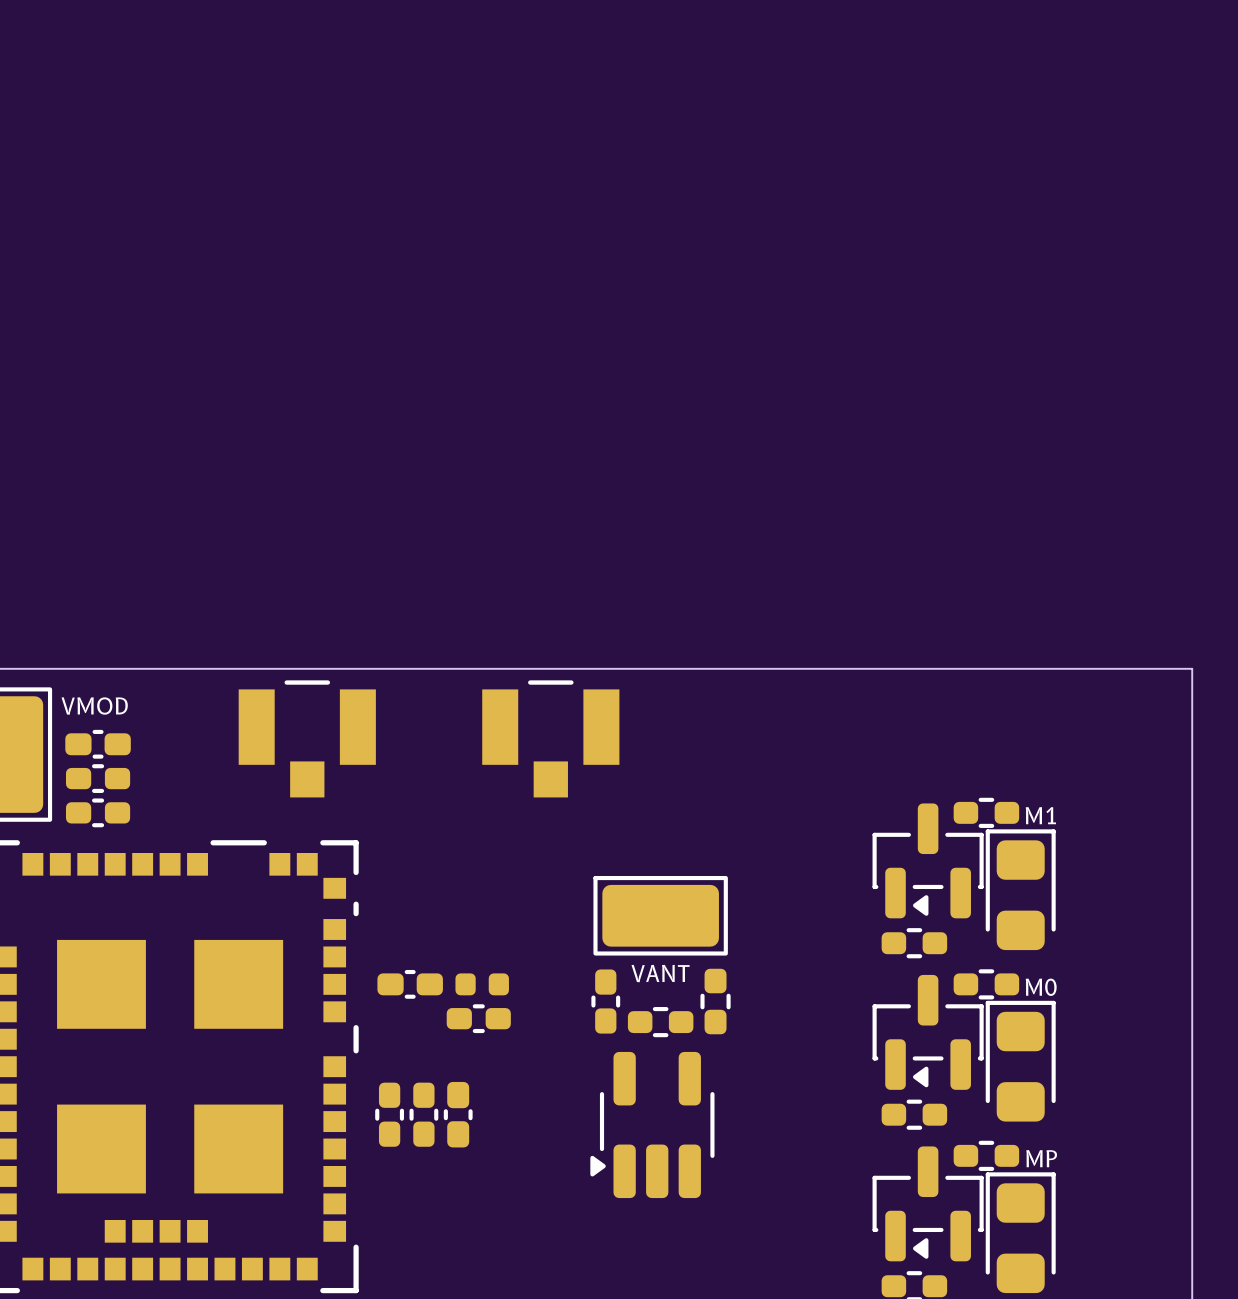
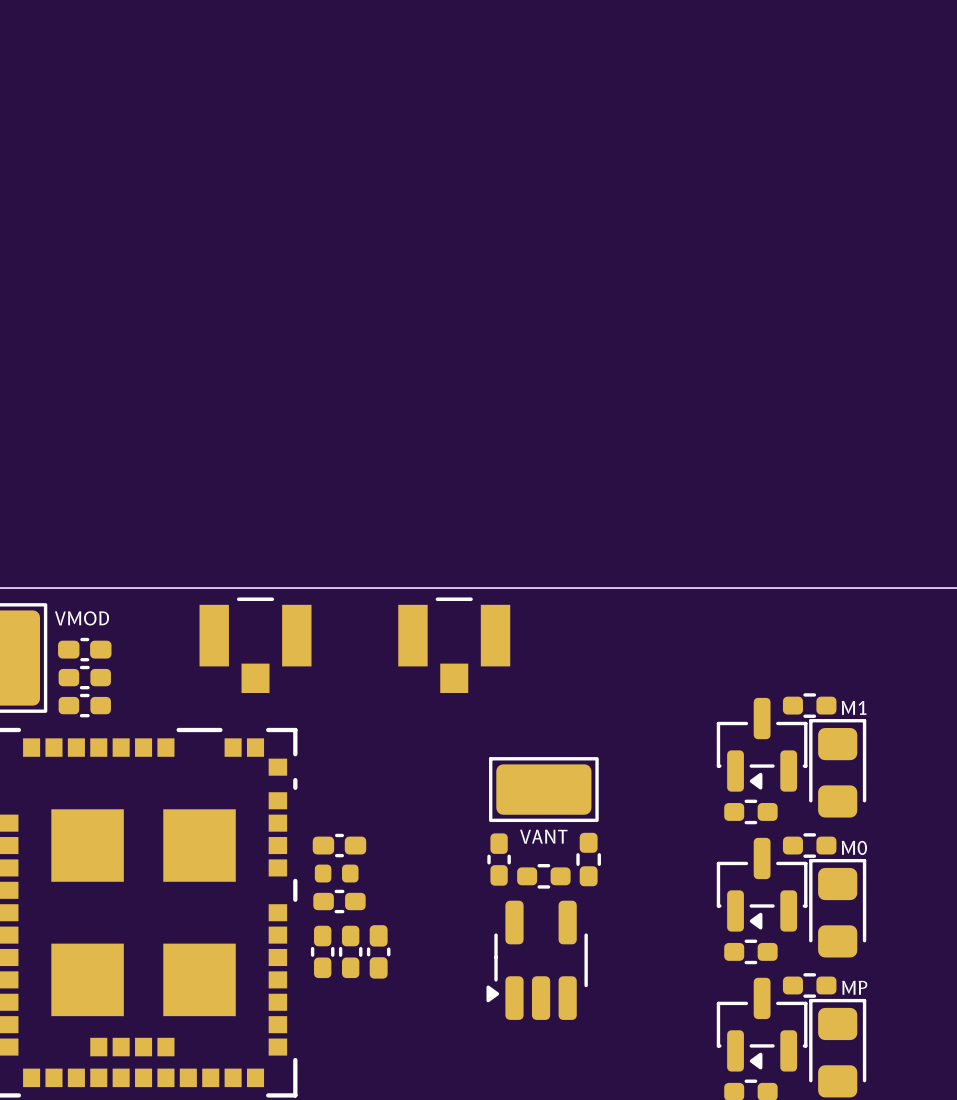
part position: (482, 984) -> (336, 873)
part position: (478, 1018) -> (339, 901)

